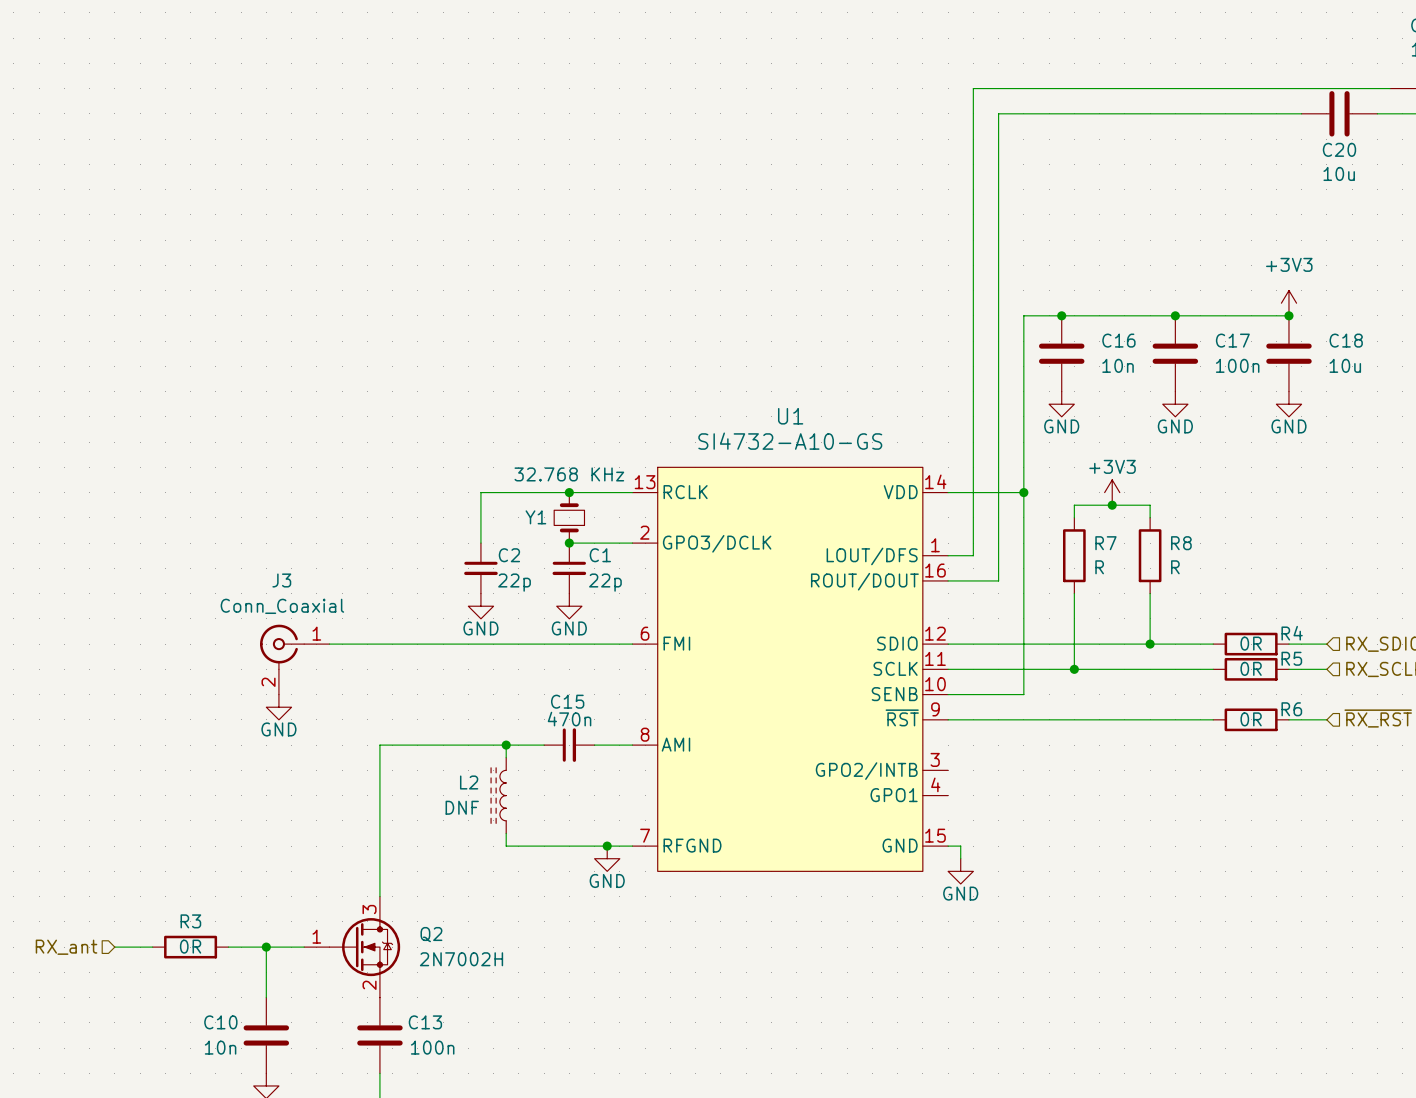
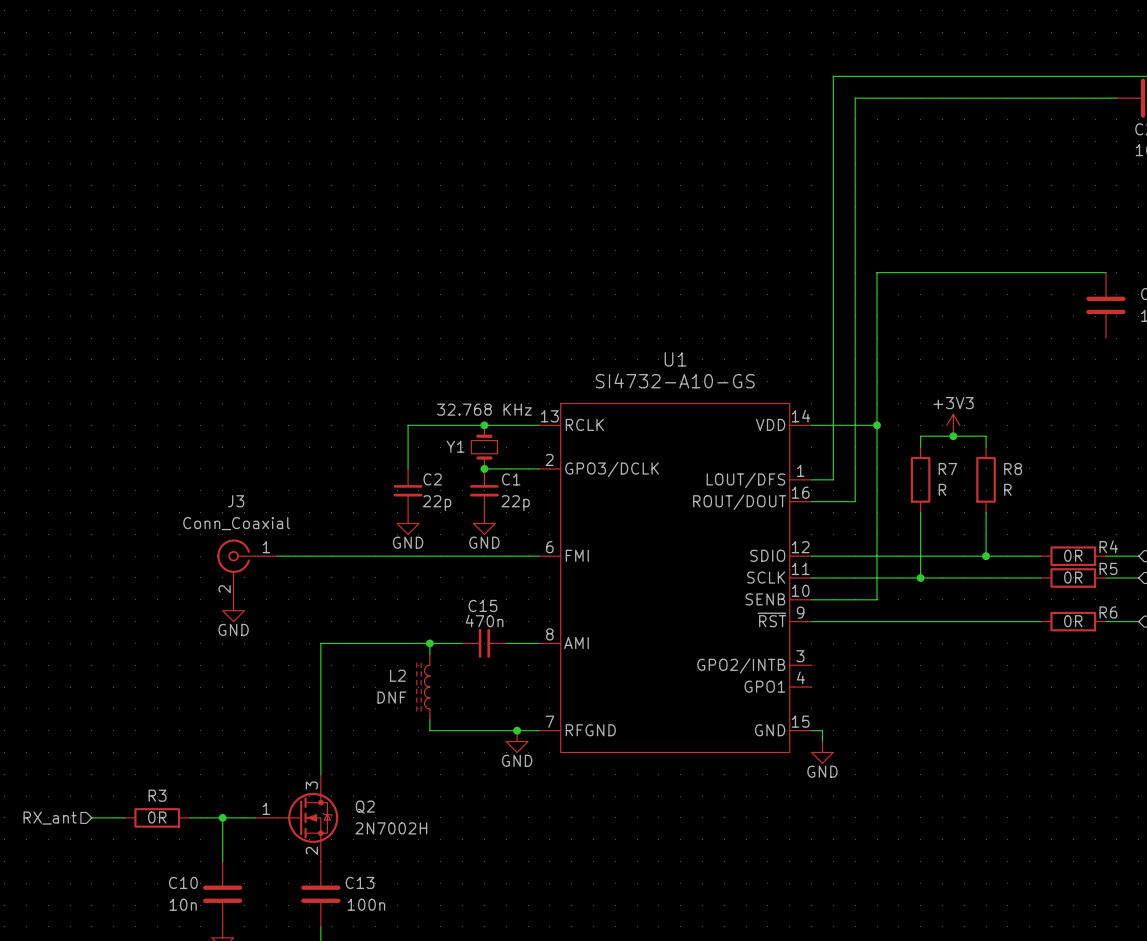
power symbol: +3V3 (1288, 303) -> none
junction: (1061, 315) -> none
junction: (1175, 315) -> none
junction: (1288, 315) -> none
C16: 10n (1061, 353) -> none
C17: 100n (1175, 353) -> none
power symbol: GND (1061, 404) -> none
power symbol: GND (1175, 404) -> none
power symbol: GND (1288, 404) -> none

